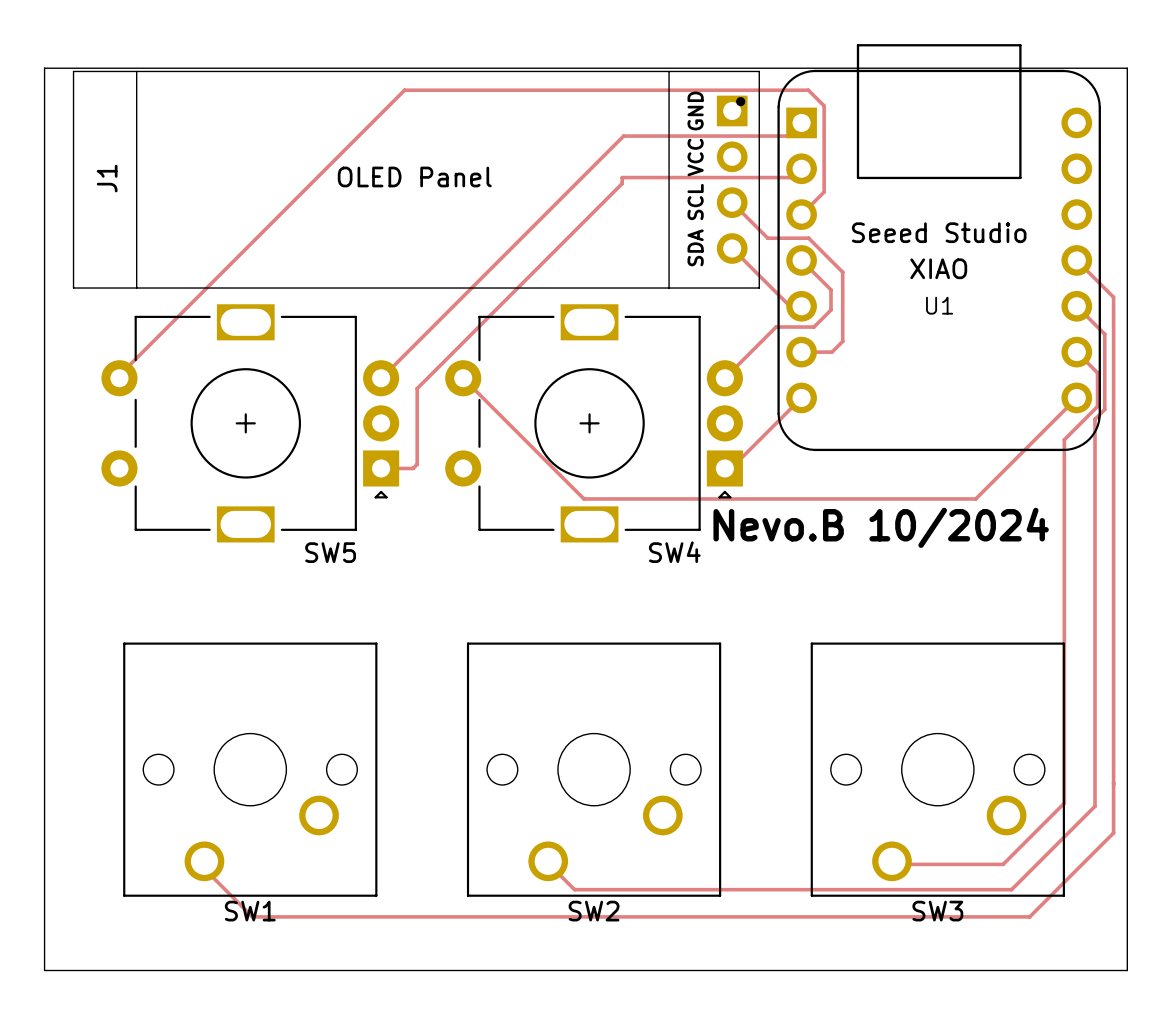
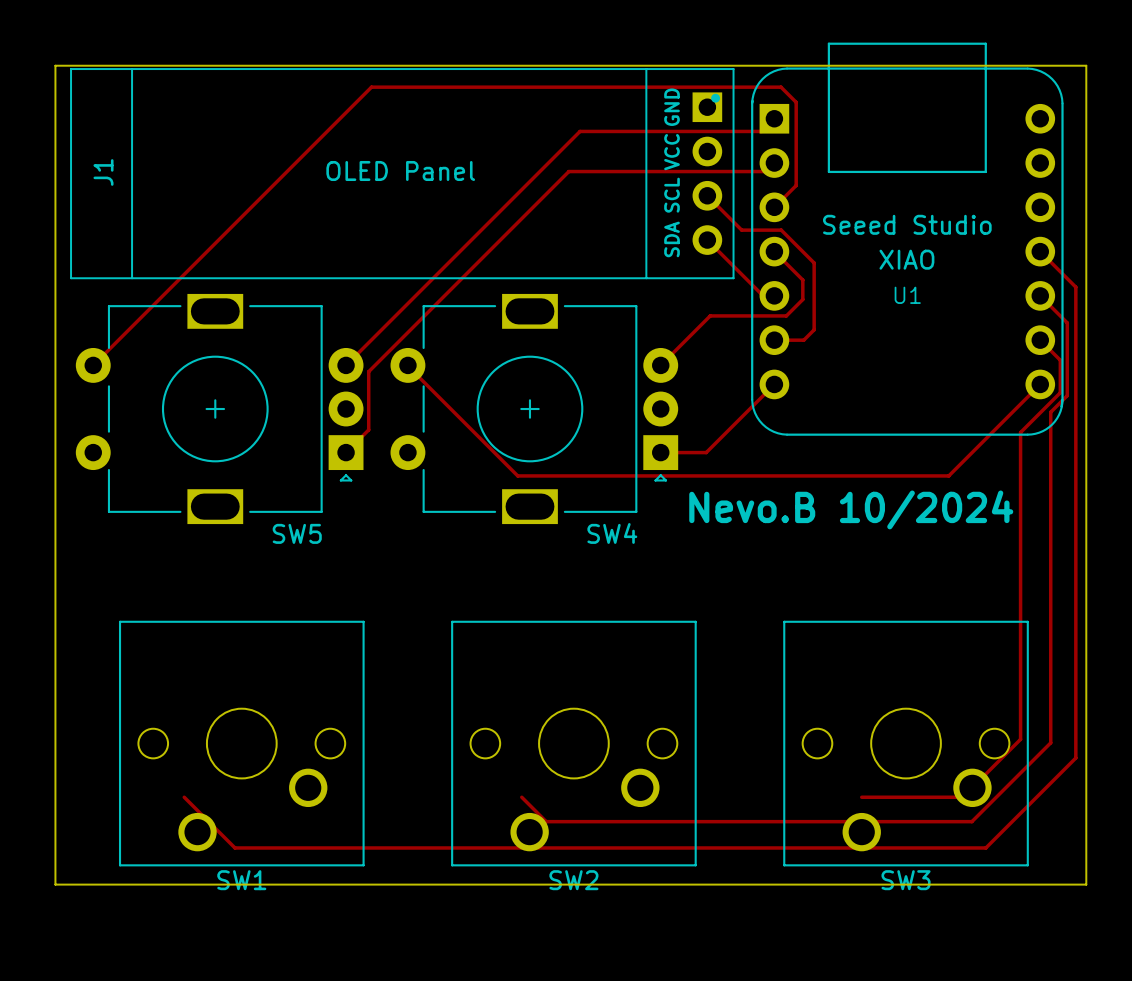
board edge: (44, 68) (1127, 68) (1127, 970) (44, 970) (44, 68) -> (55, 65) (55, 884) (1086, 884) (1086, 65) (55, 65)
track: (404, 90) (116, 378) -> (390, 87) (371, 87) (93, 365)
track: (623, 136) (381, 378) -> (602, 131) (580, 131) (346, 365)
track: (622, 177) (622, 183) (417, 388) (417, 464) (413, 468) (381, 468) -> (601, 171) (568, 171) (368, 371) (368, 429) (346, 452)
track: (776, 327) (724, 378) -> (749, 315) (710, 315) (660, 365)
track: (463, 378) (583, 498) (975, 498) (982, 492) -> (407, 366) (517, 475) (948, 475)
track: (1095, 419) (1095, 806) (1011, 889) (574, 889) (549, 864) -> (1057, 405) (1050, 412) (1050, 742) (971, 821) (546, 821) (521, 797)
SW5 position: (250, 423) -> (219, 409)
SW4 position: (594, 423) -> (534, 409)
track: (1064, 439) (1064, 803) (1003, 864) (901, 864) -> (1028, 424) (1020, 432) (1020, 739) (962, 797) (861, 797)
track: none -> (660, 452) (706, 452)
track: (1113, 784) (1113, 833) (1029, 916) (252, 916) (199, 864) -> (1075, 758) (985, 847) (235, 847) (184, 797)

